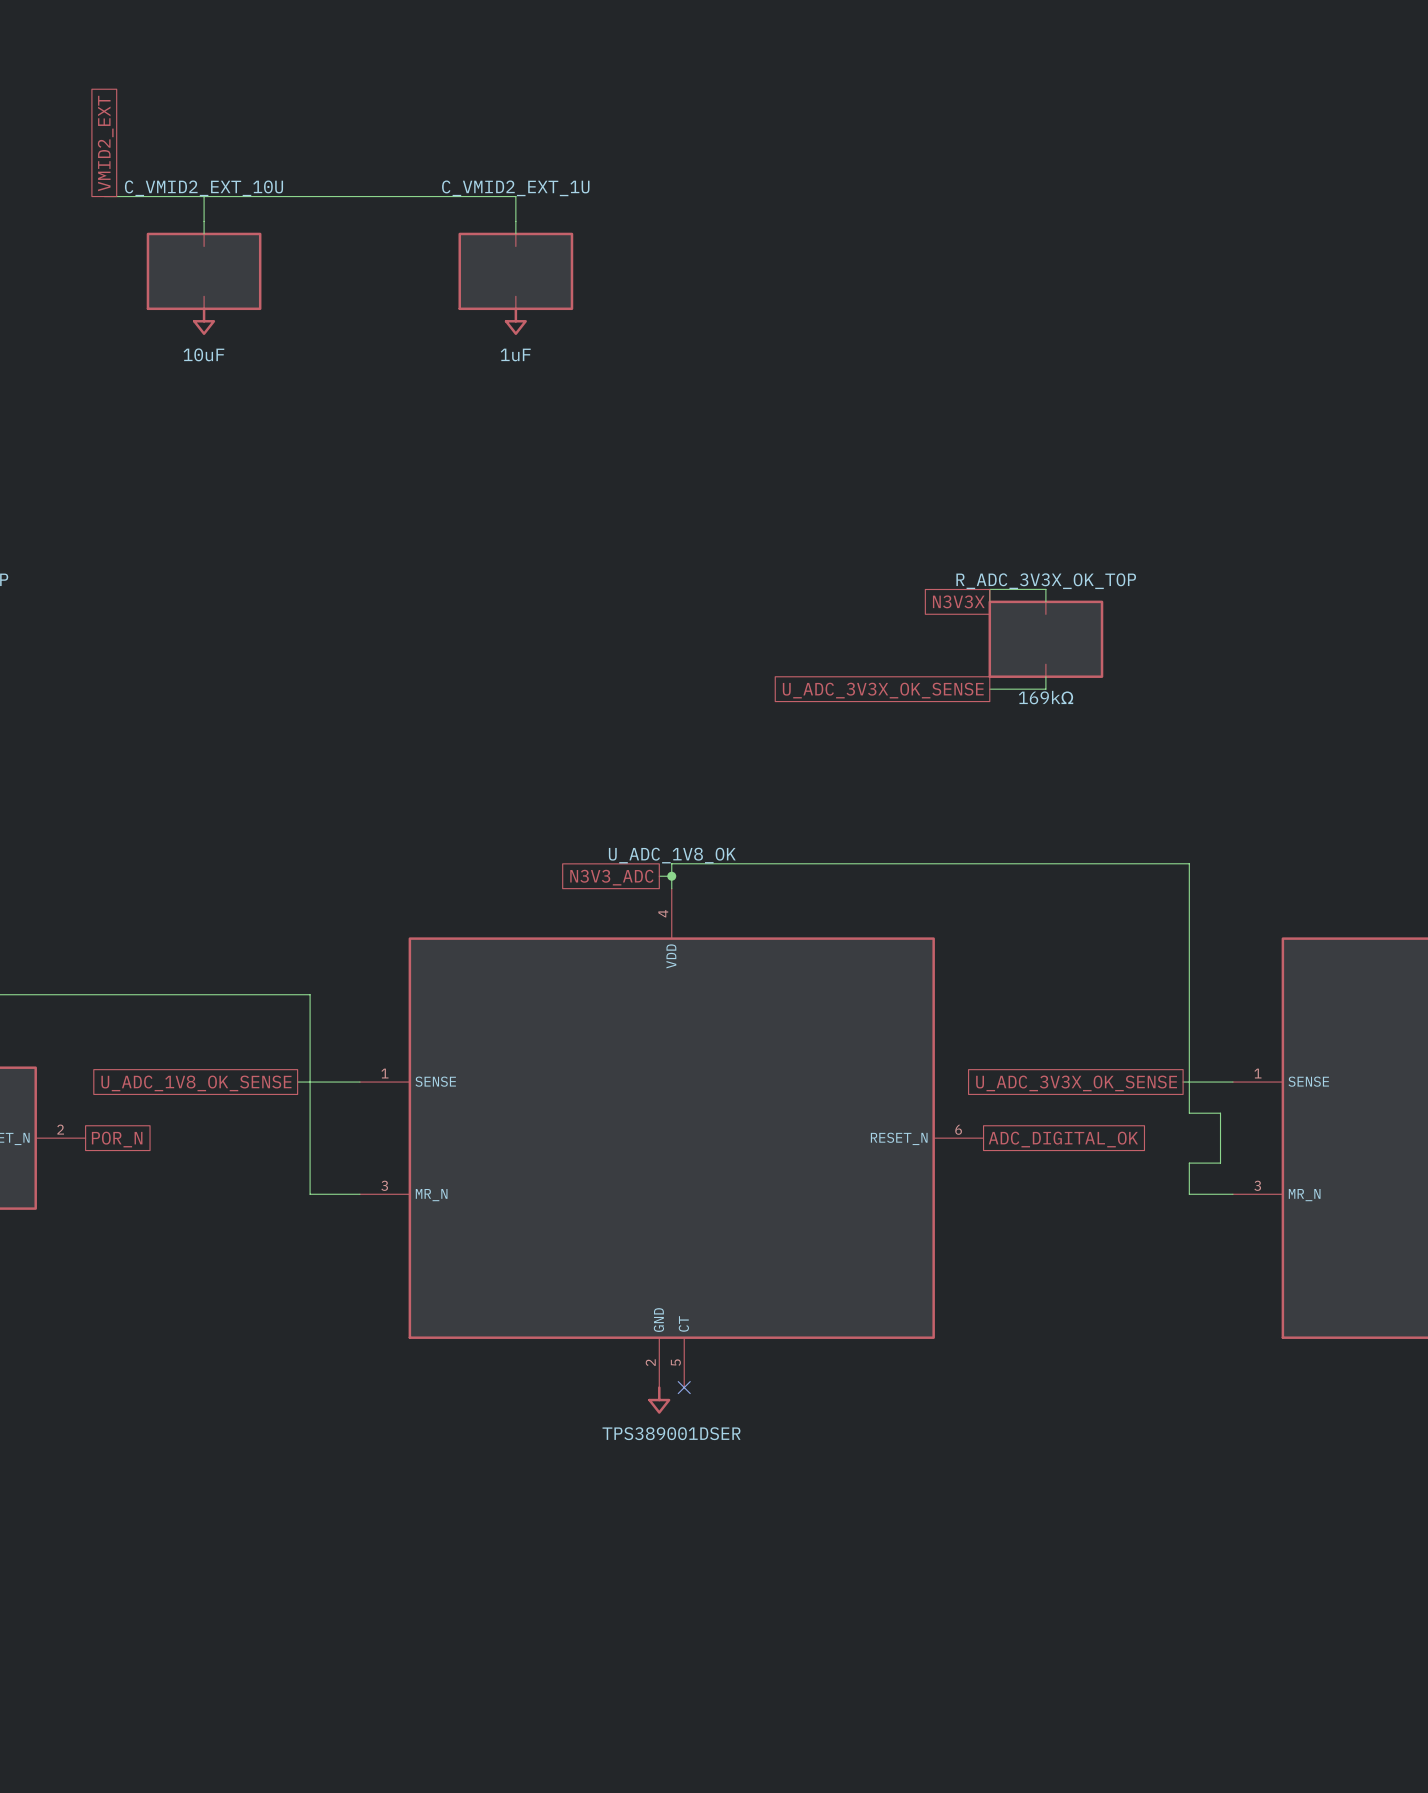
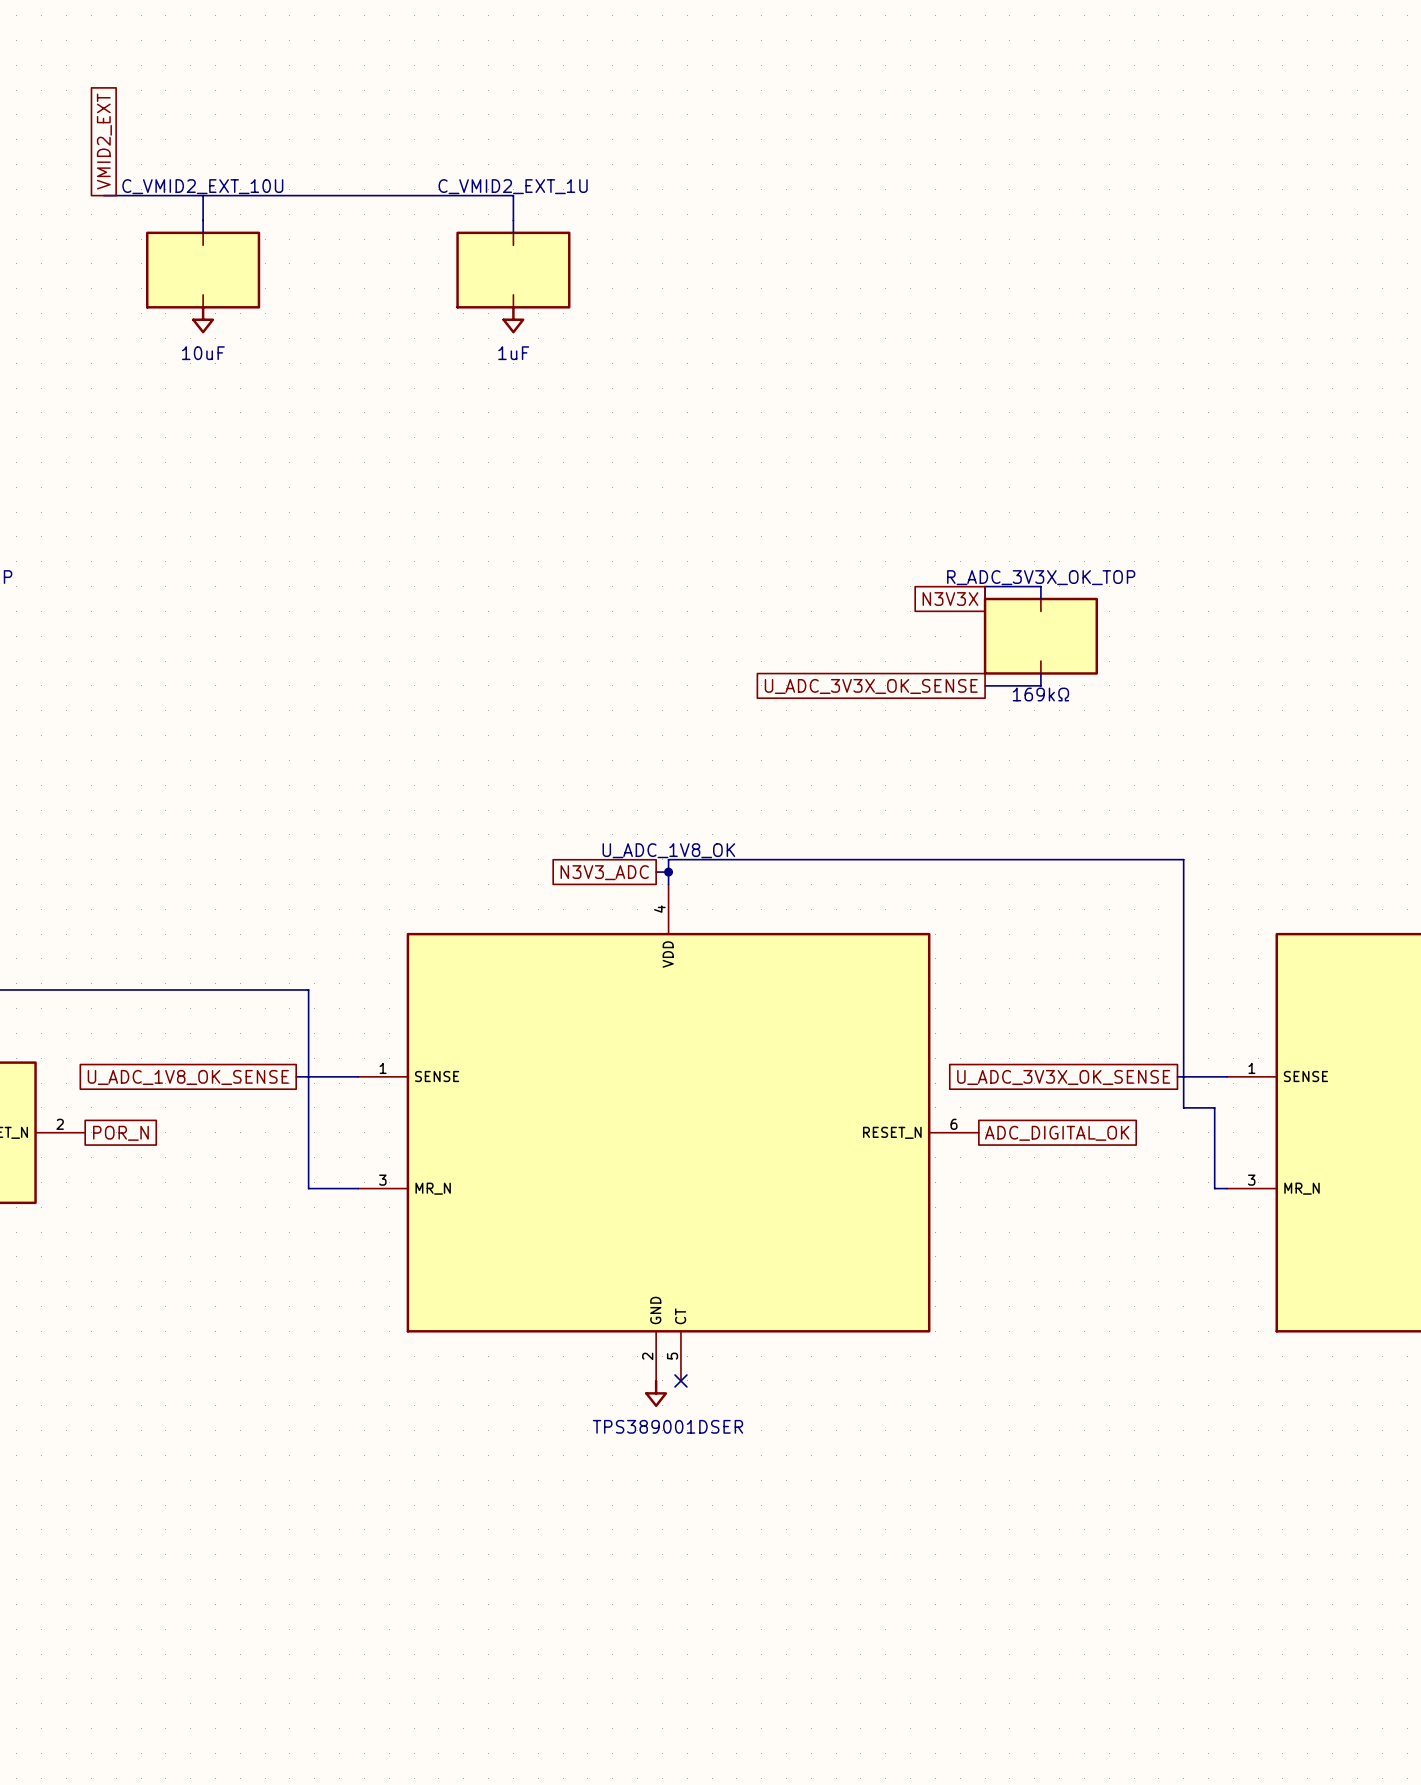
wire: (1220, 1163) (1189, 1163) (1189, 1194) (1220, 1194) -> (1214, 1157) (1214, 1188)

